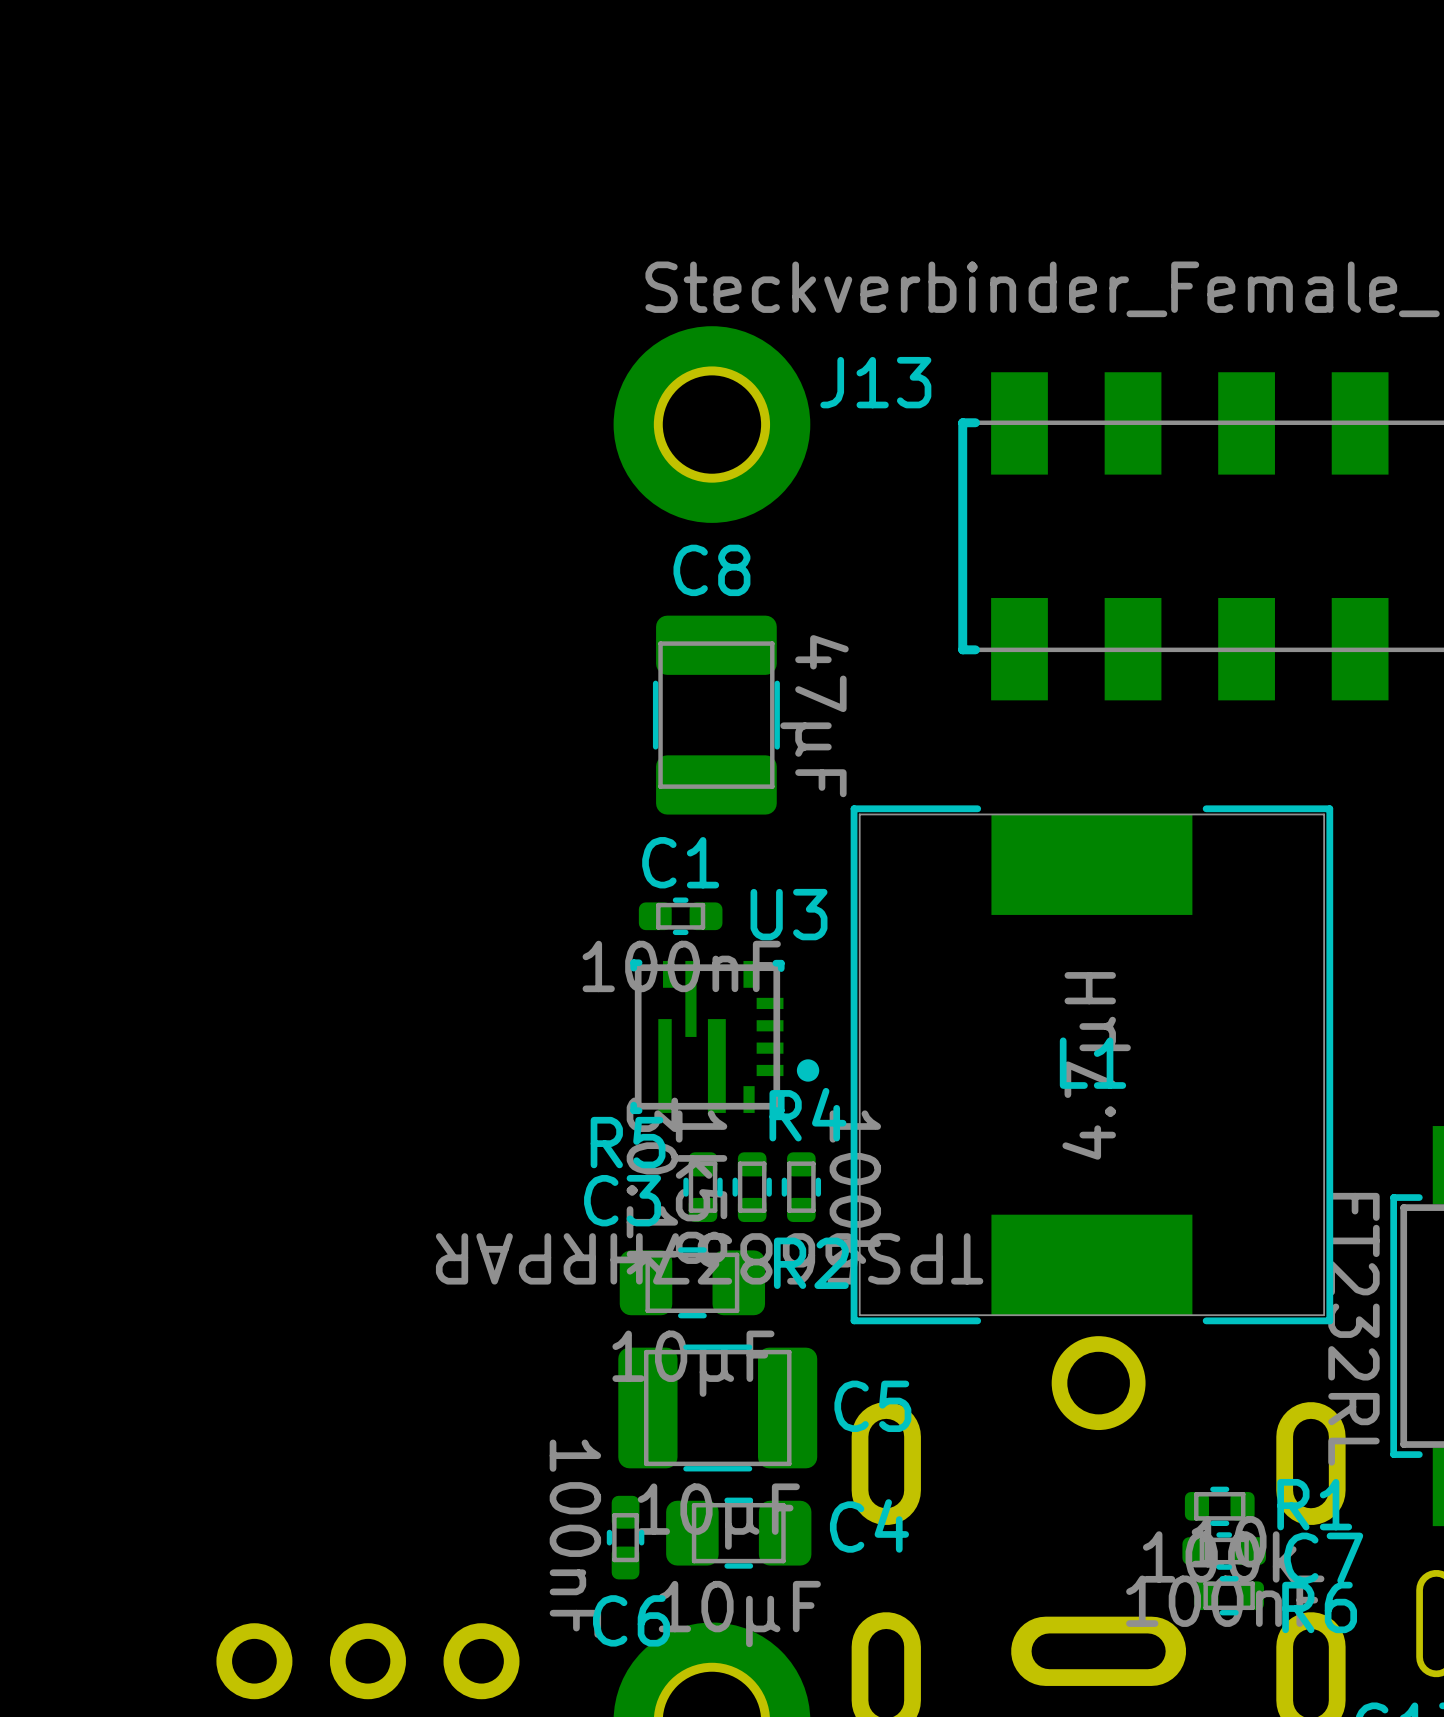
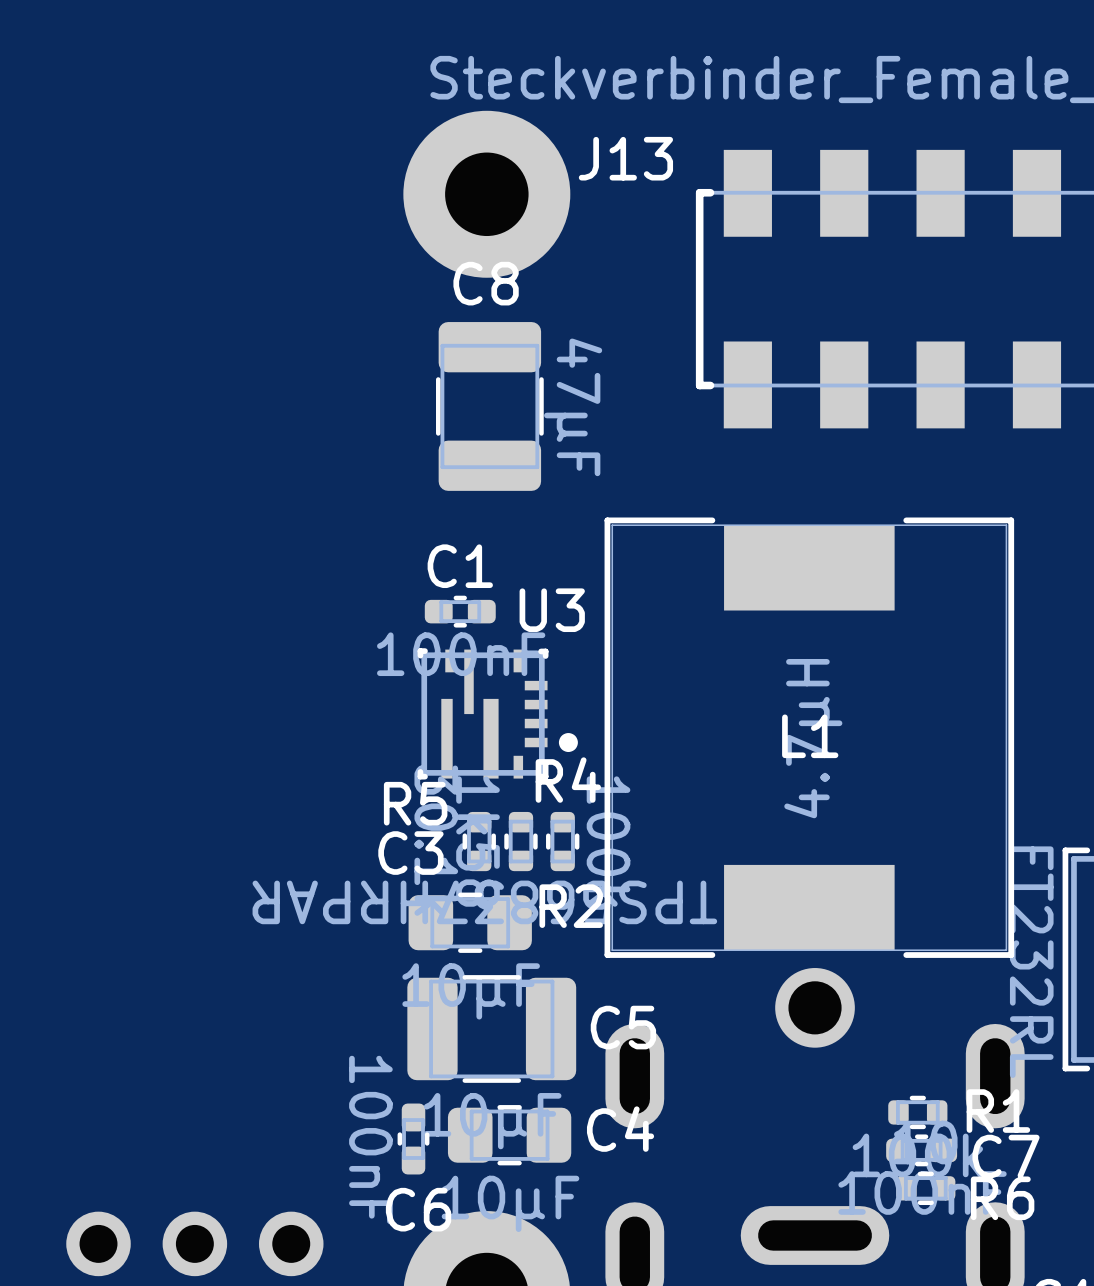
C8 position: (716, 715) -> (489, 406)

